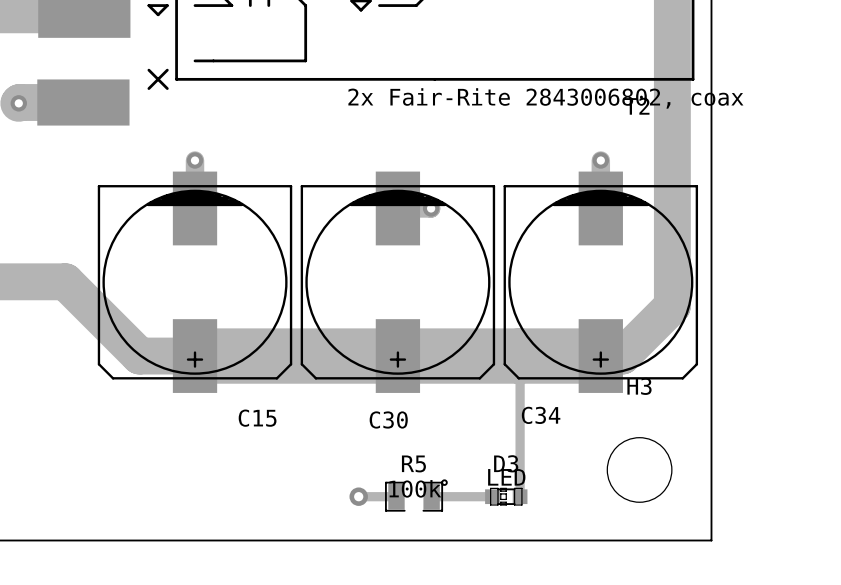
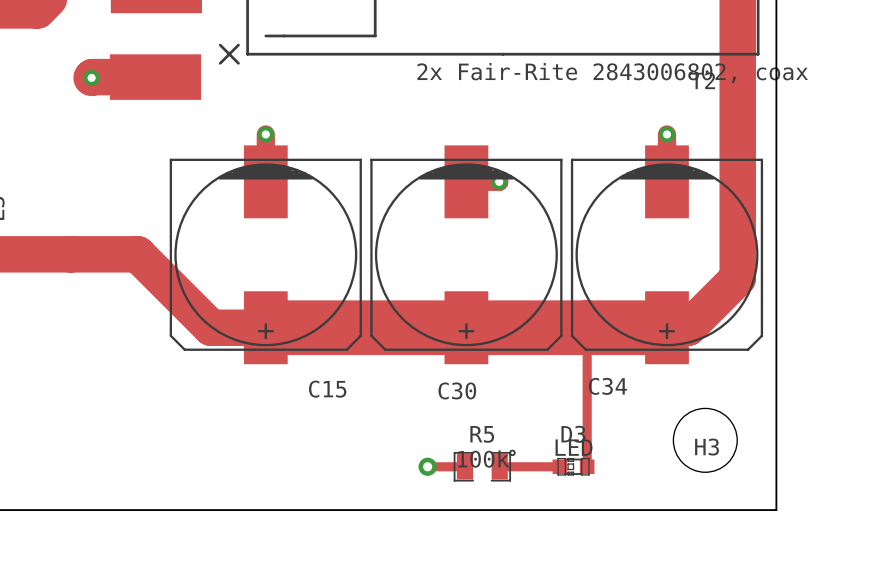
H3 name position: H3 (639, 386) -> H3 (707, 447)

